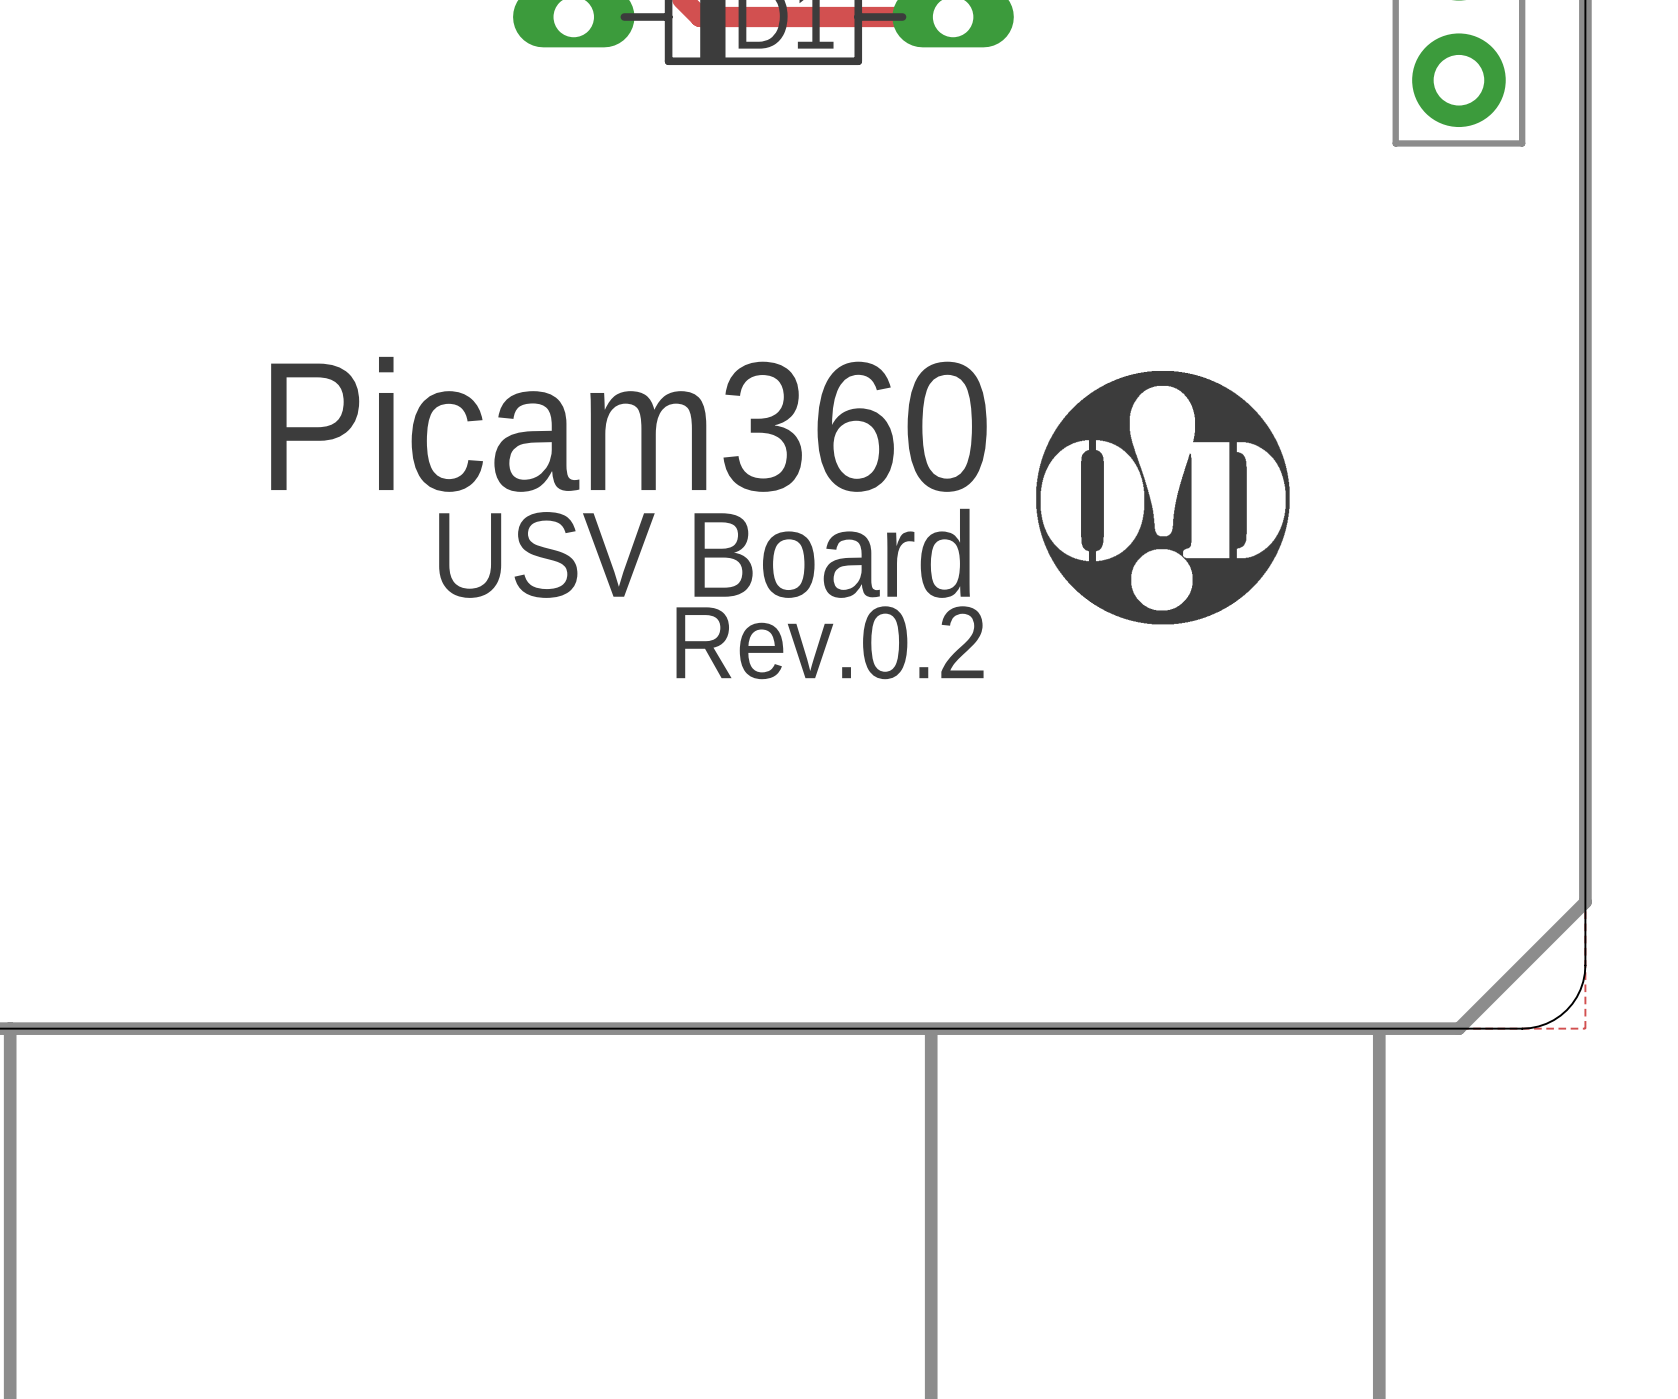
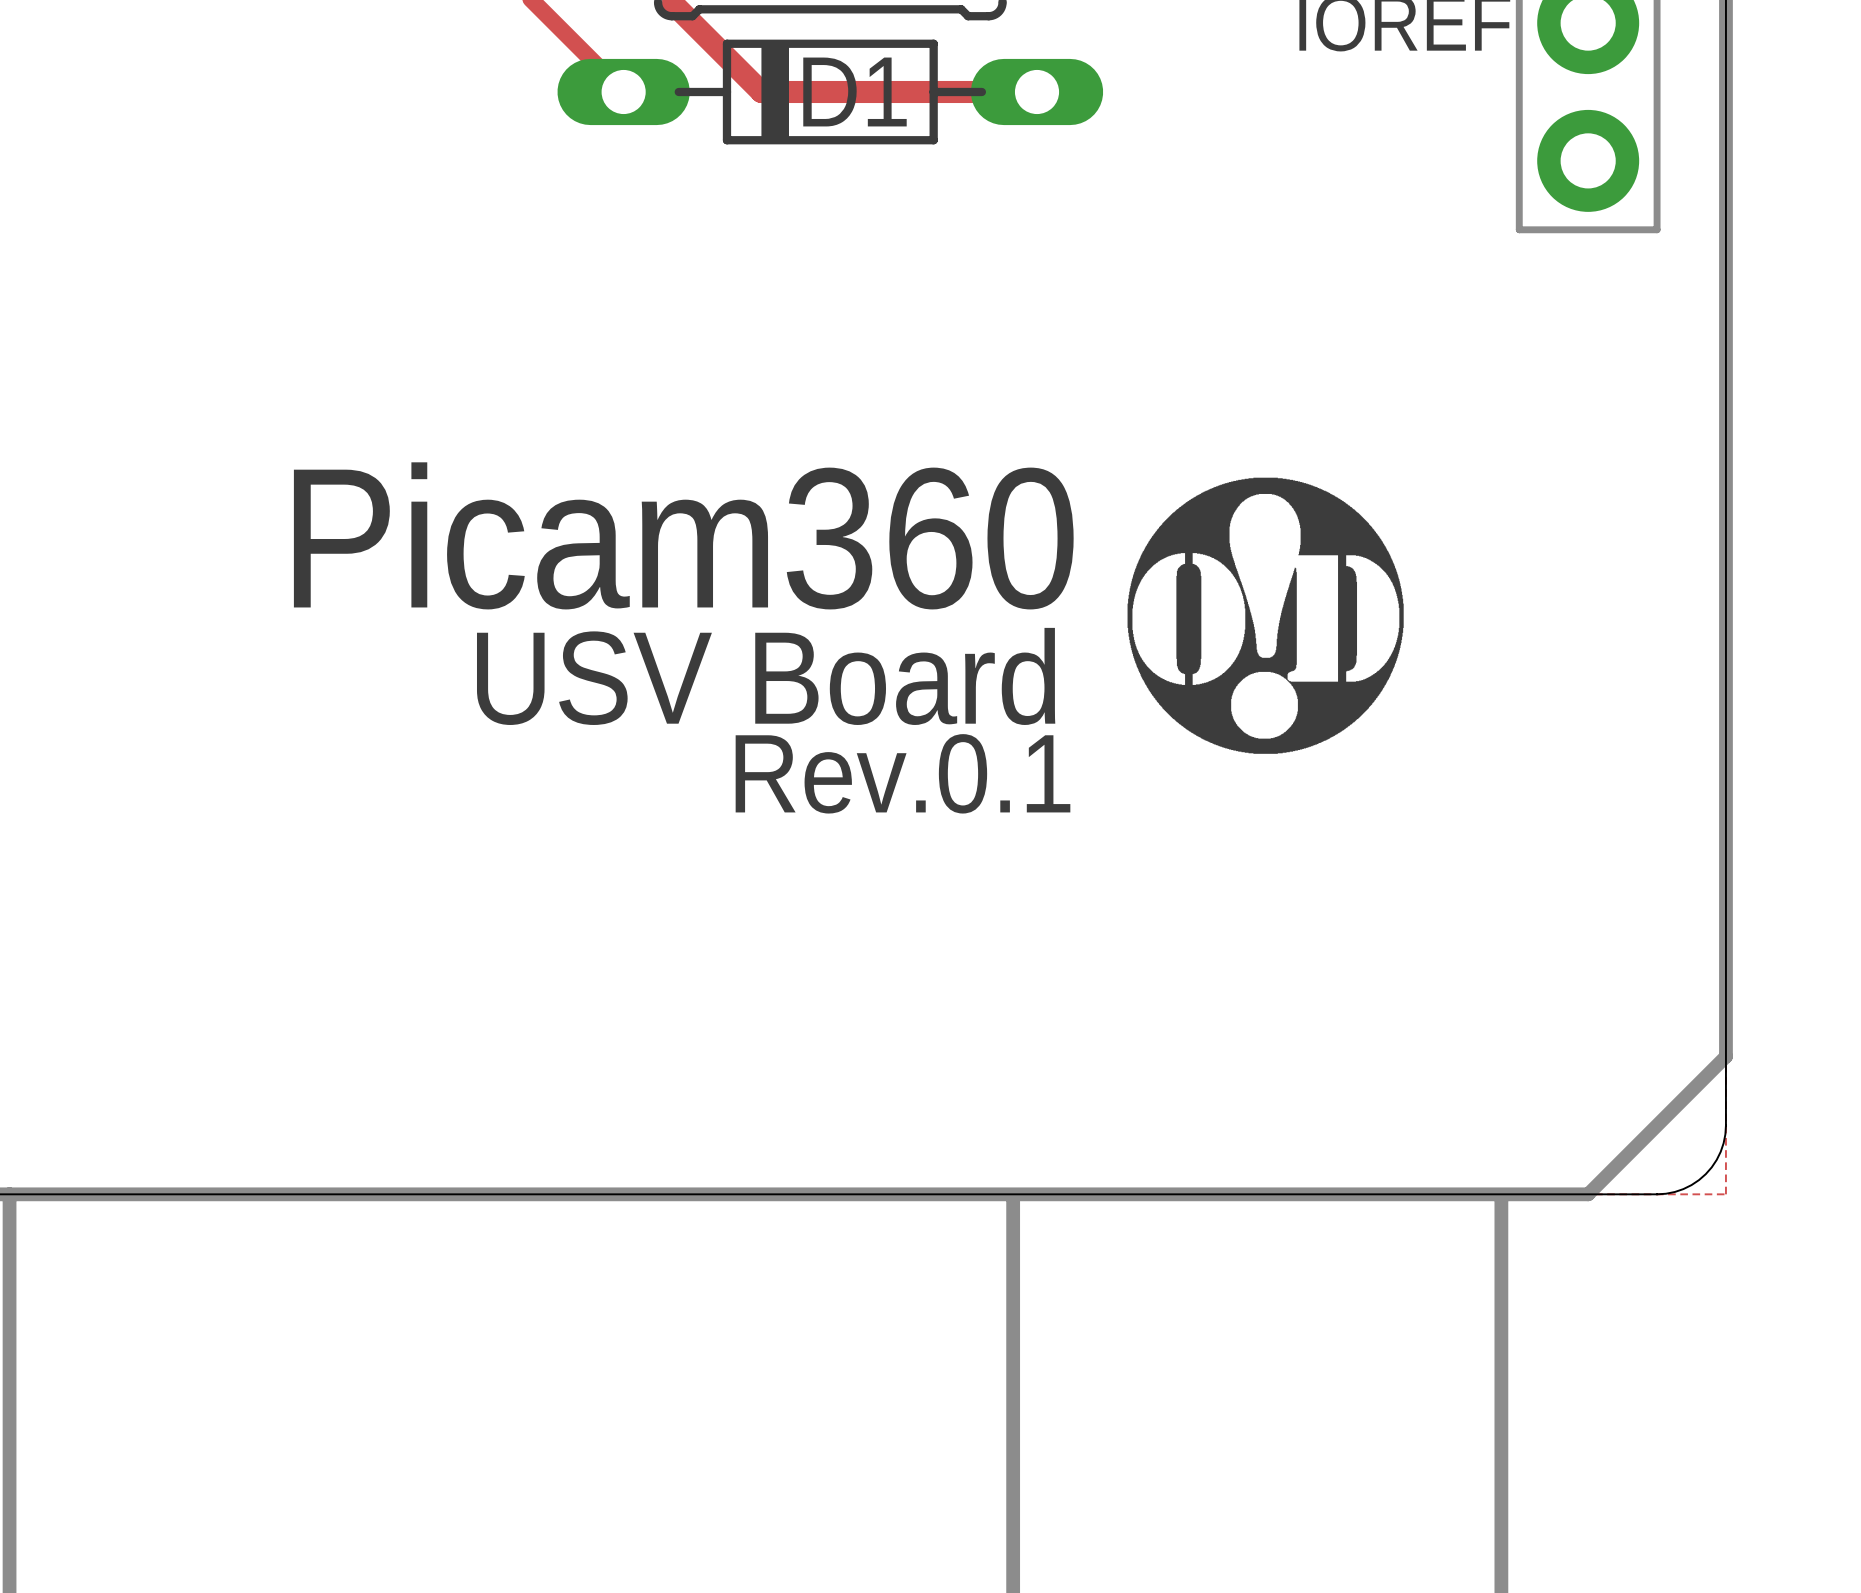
text: Rev.0.2 (830, 642) -> Rev.0.1 (902, 773)

